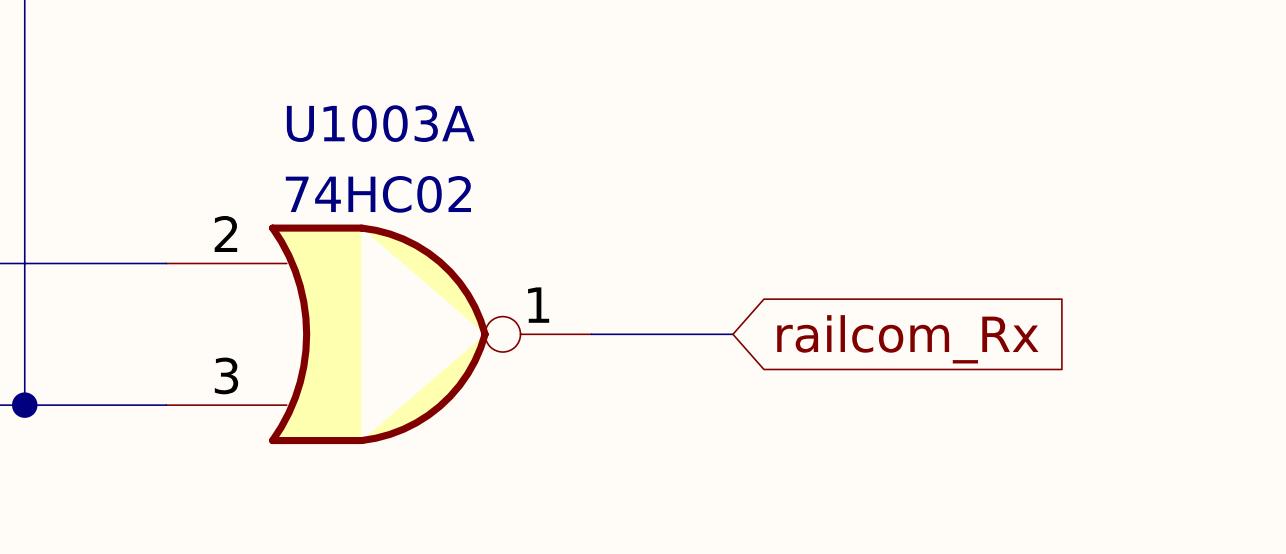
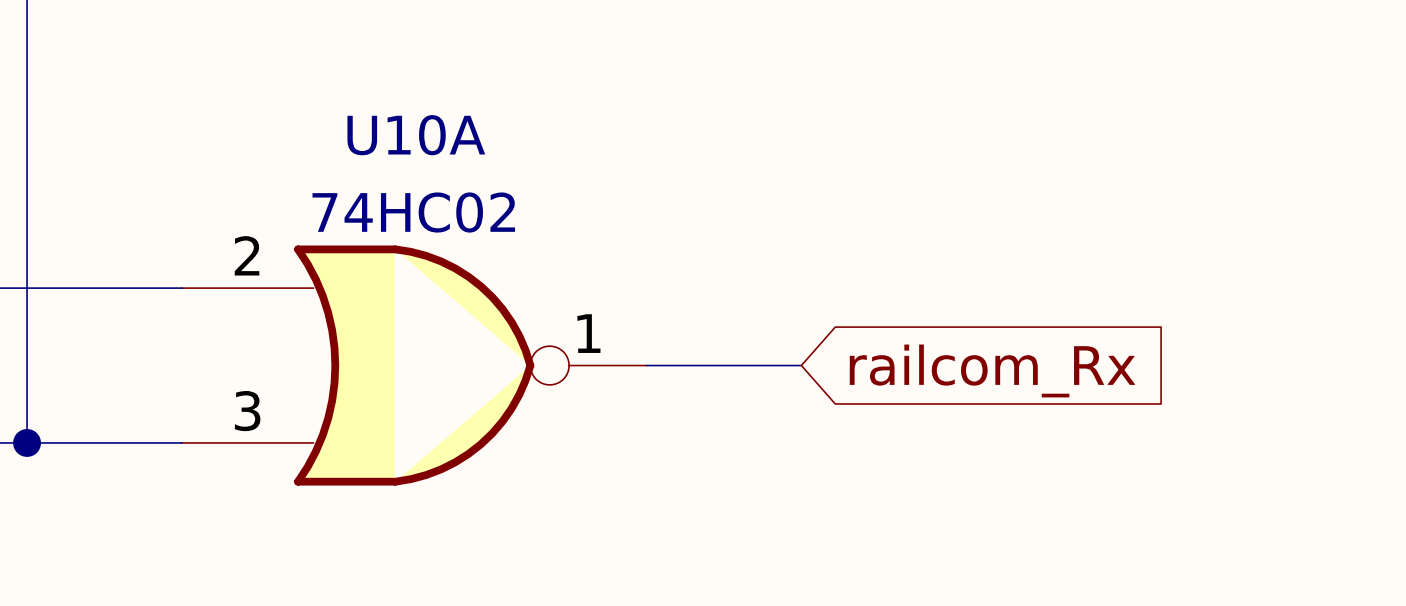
U1003A name: U1003A (380, 123) -> U10A (416, 135)

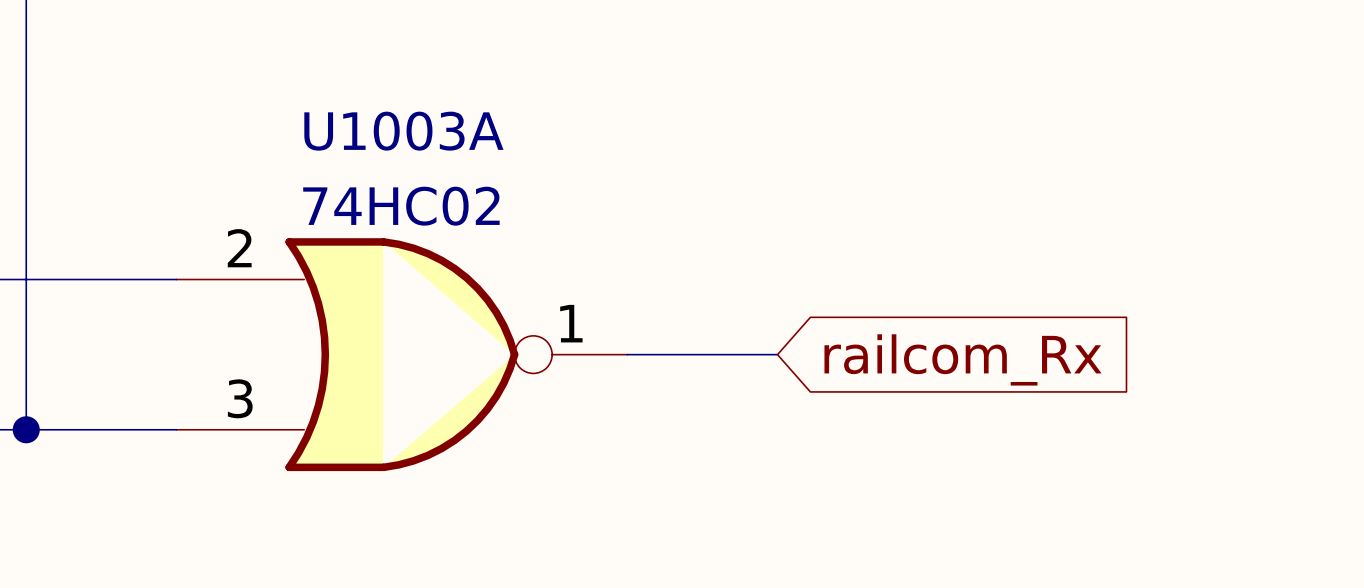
U10A name: U10A (416, 135) -> U1003A (403, 131)

